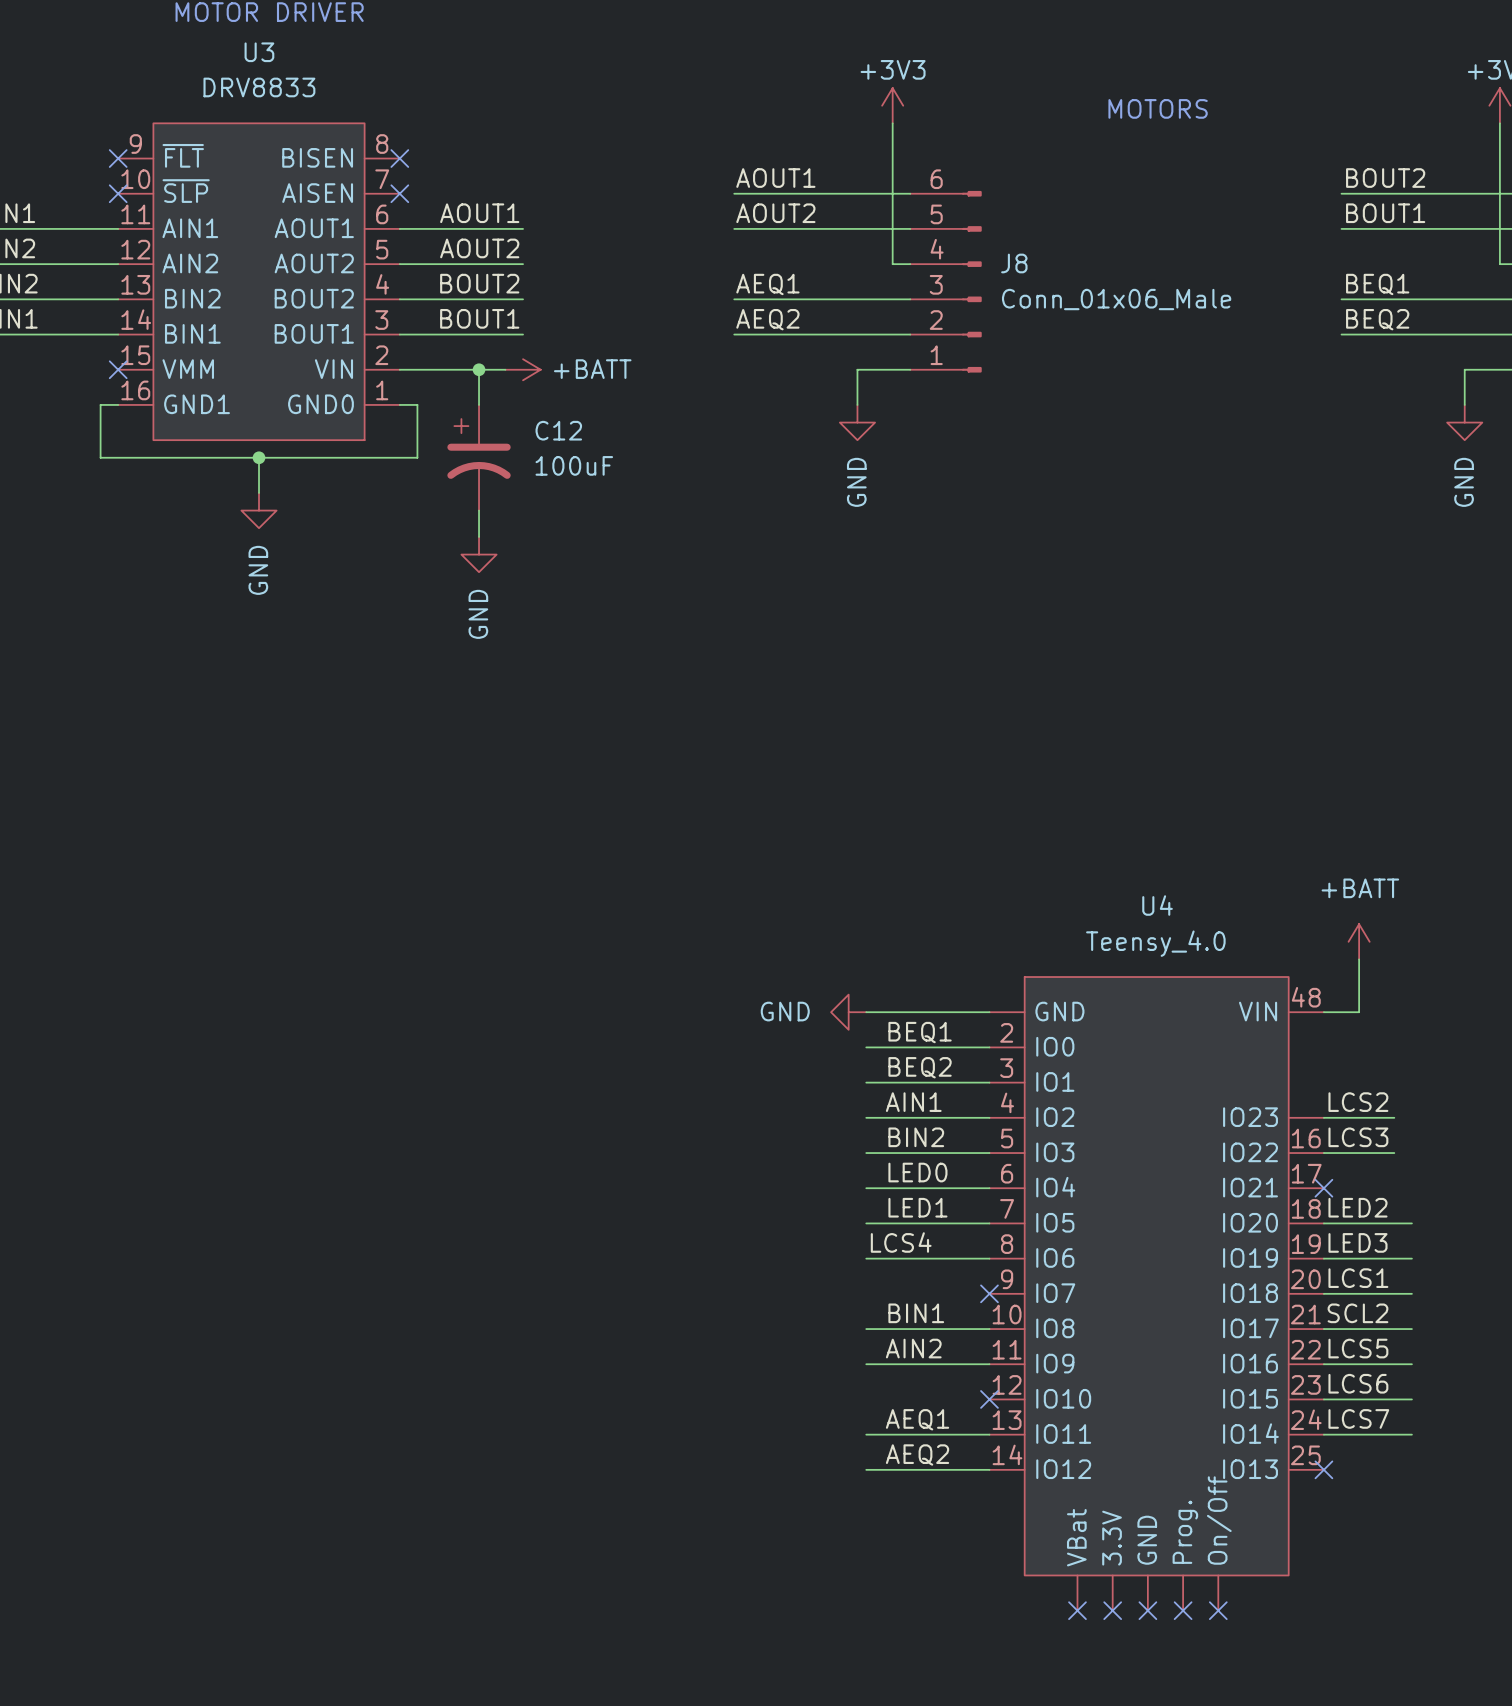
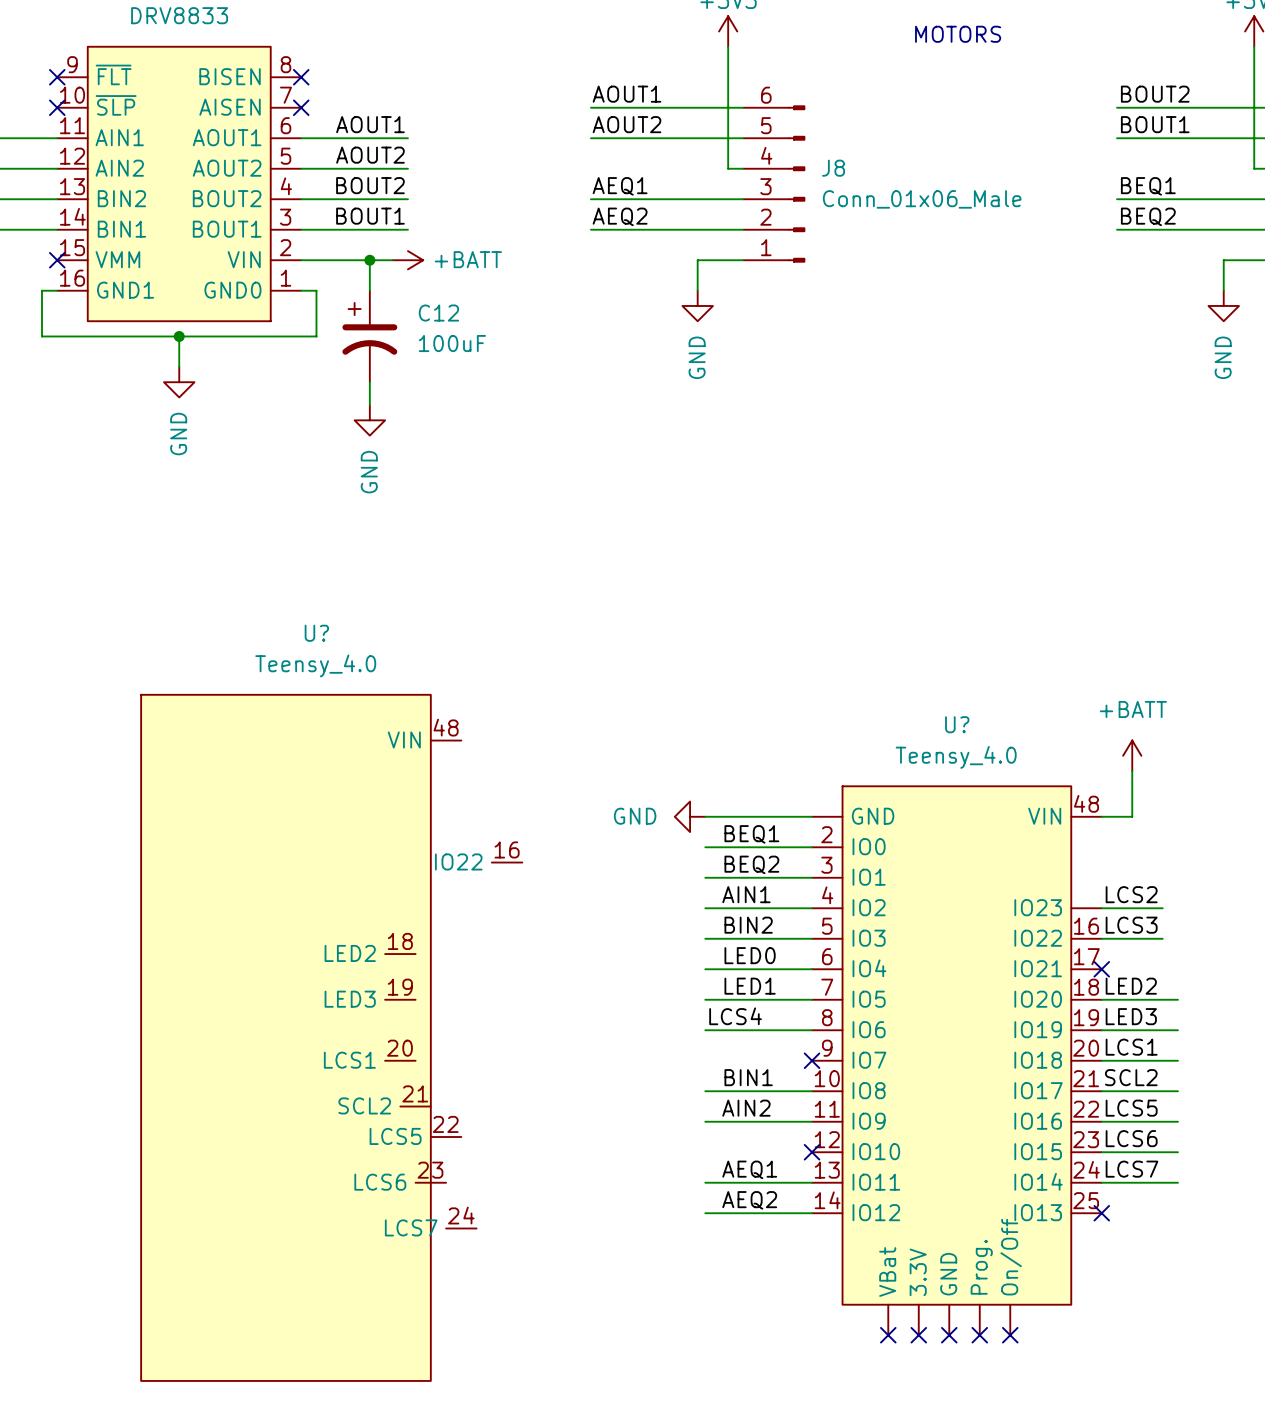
U4 name: U4 (1157, 905) -> U? (957, 724)
U?: none -> Teensy_4.0 (331, 1037)

